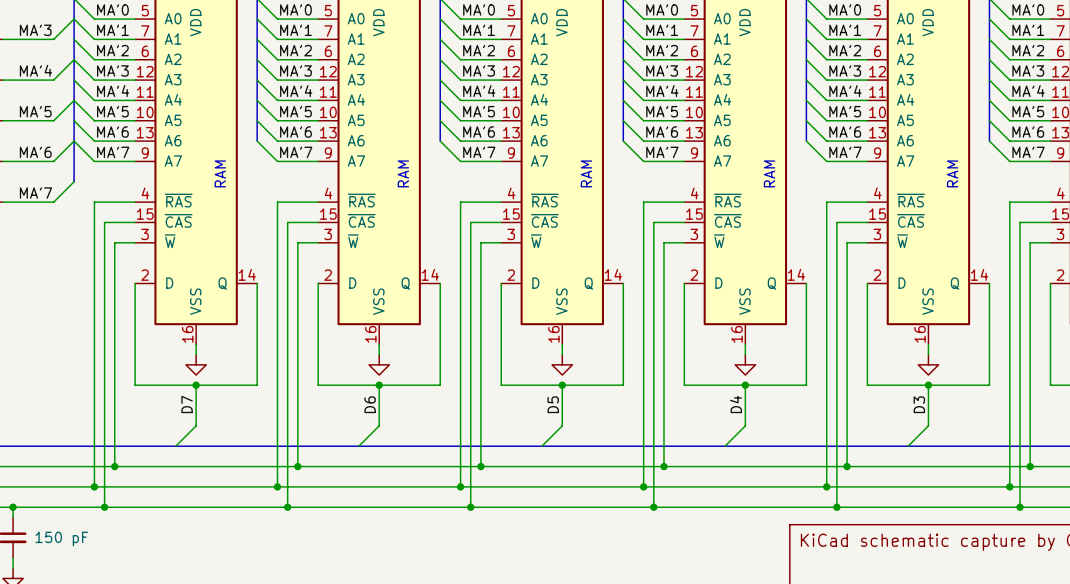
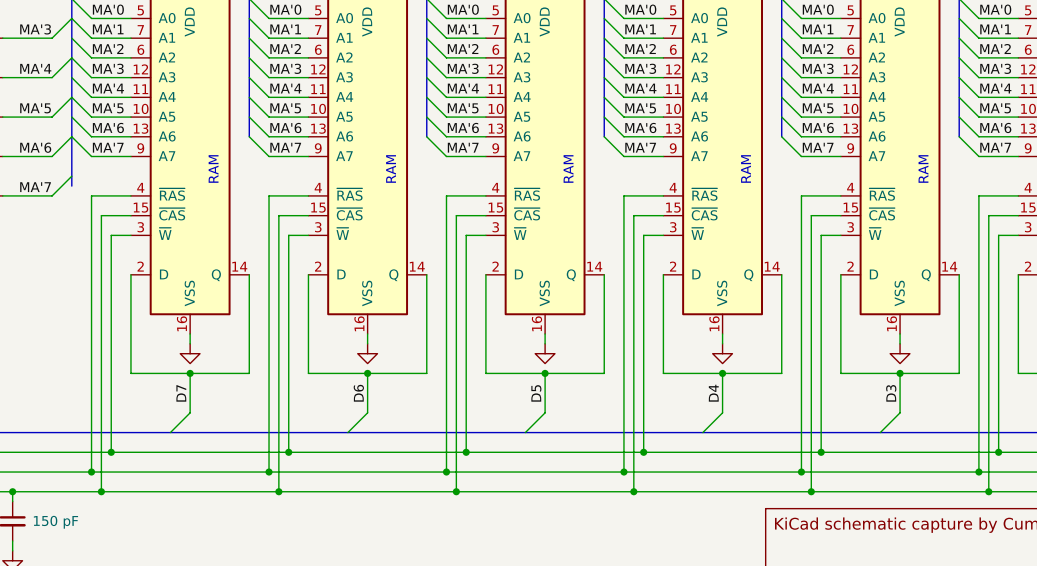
bus: none -> (71, 176) (71, 186)

